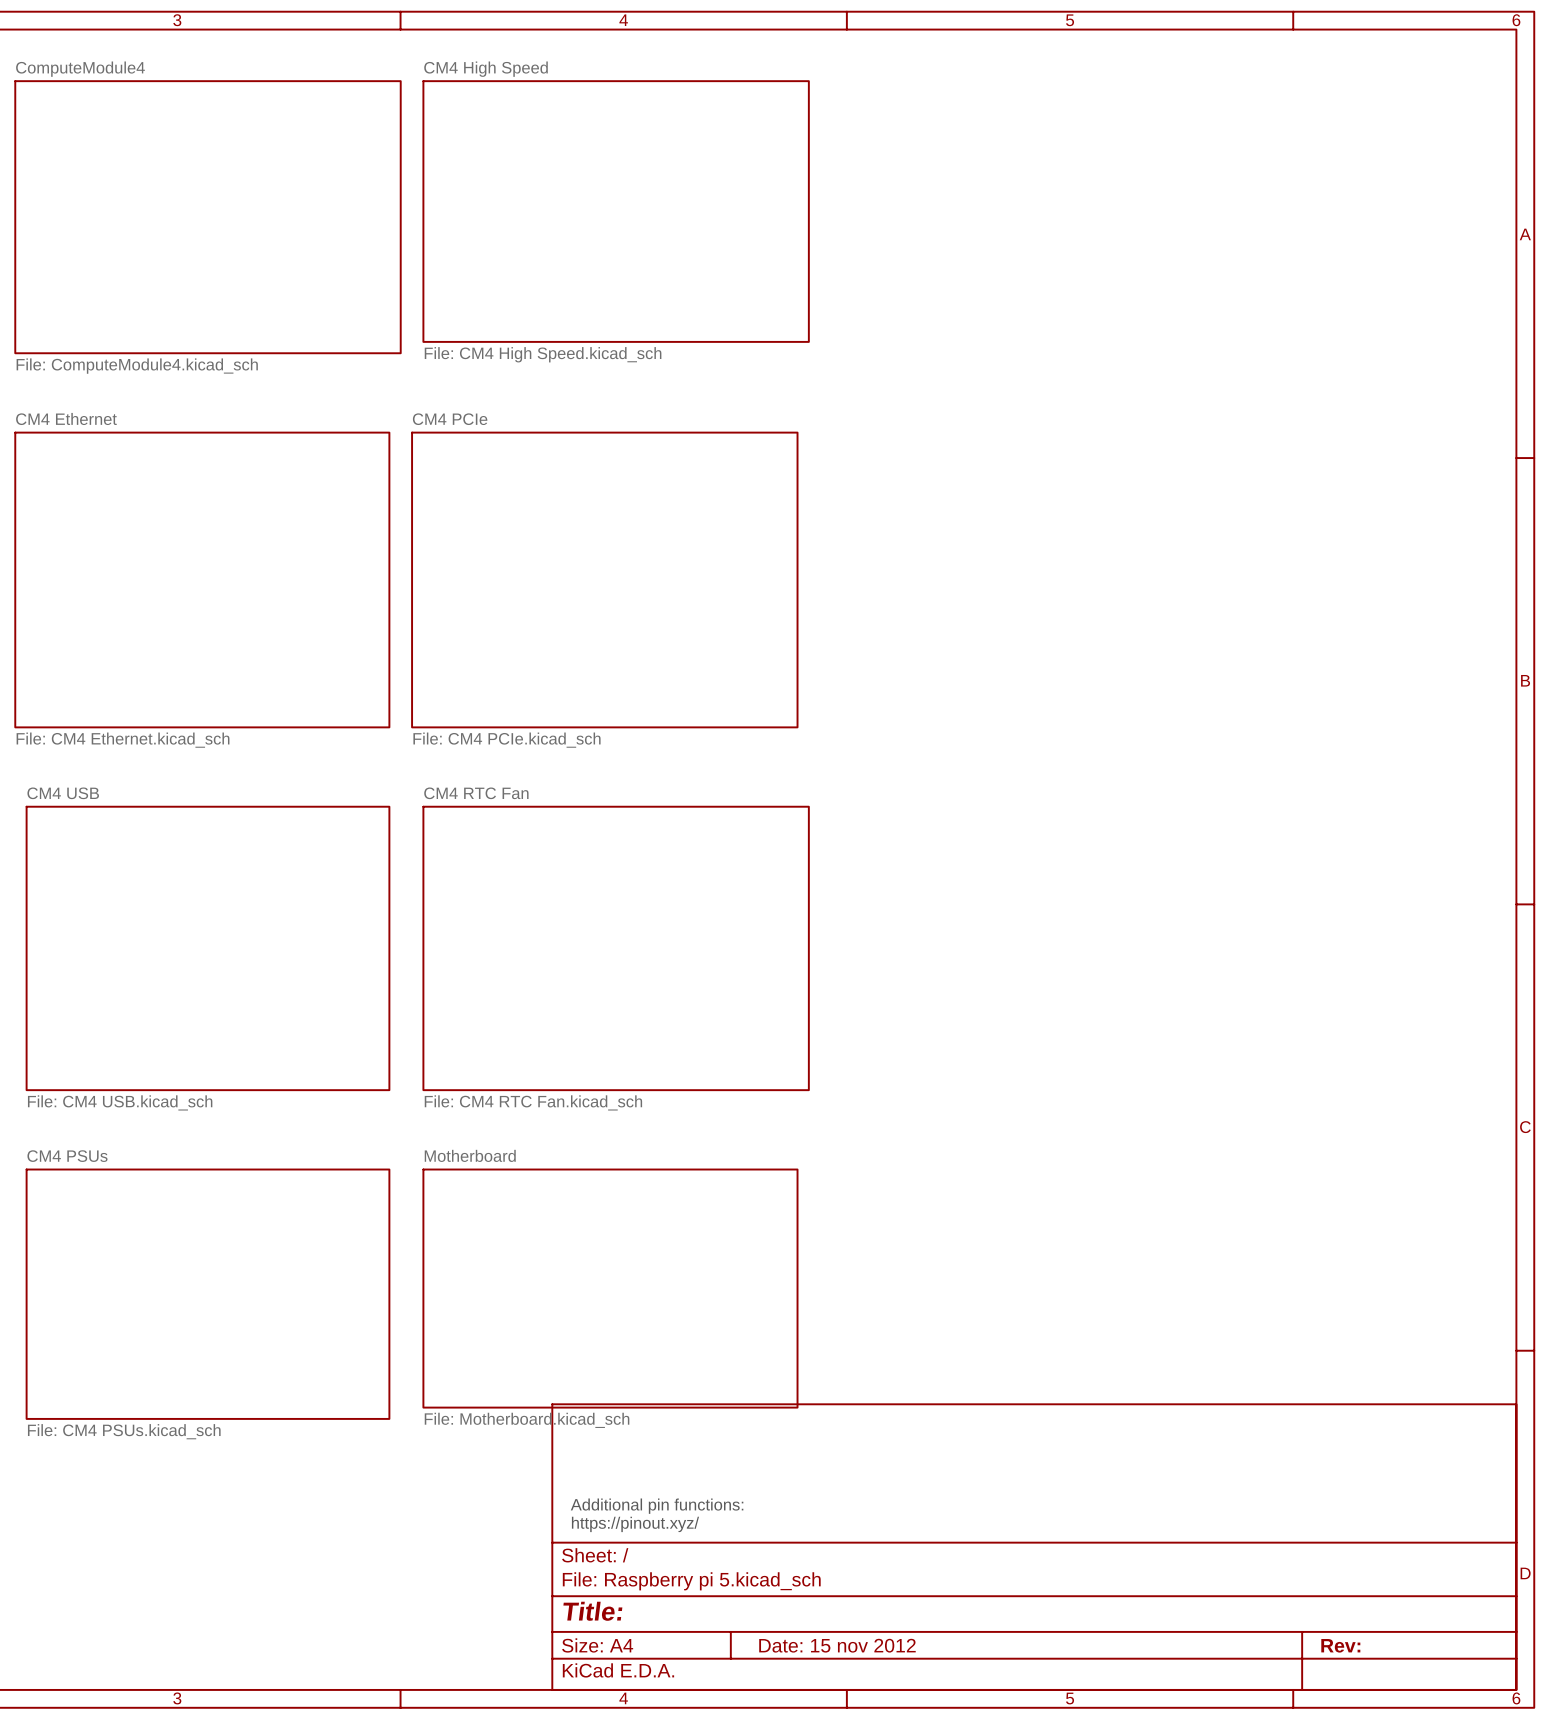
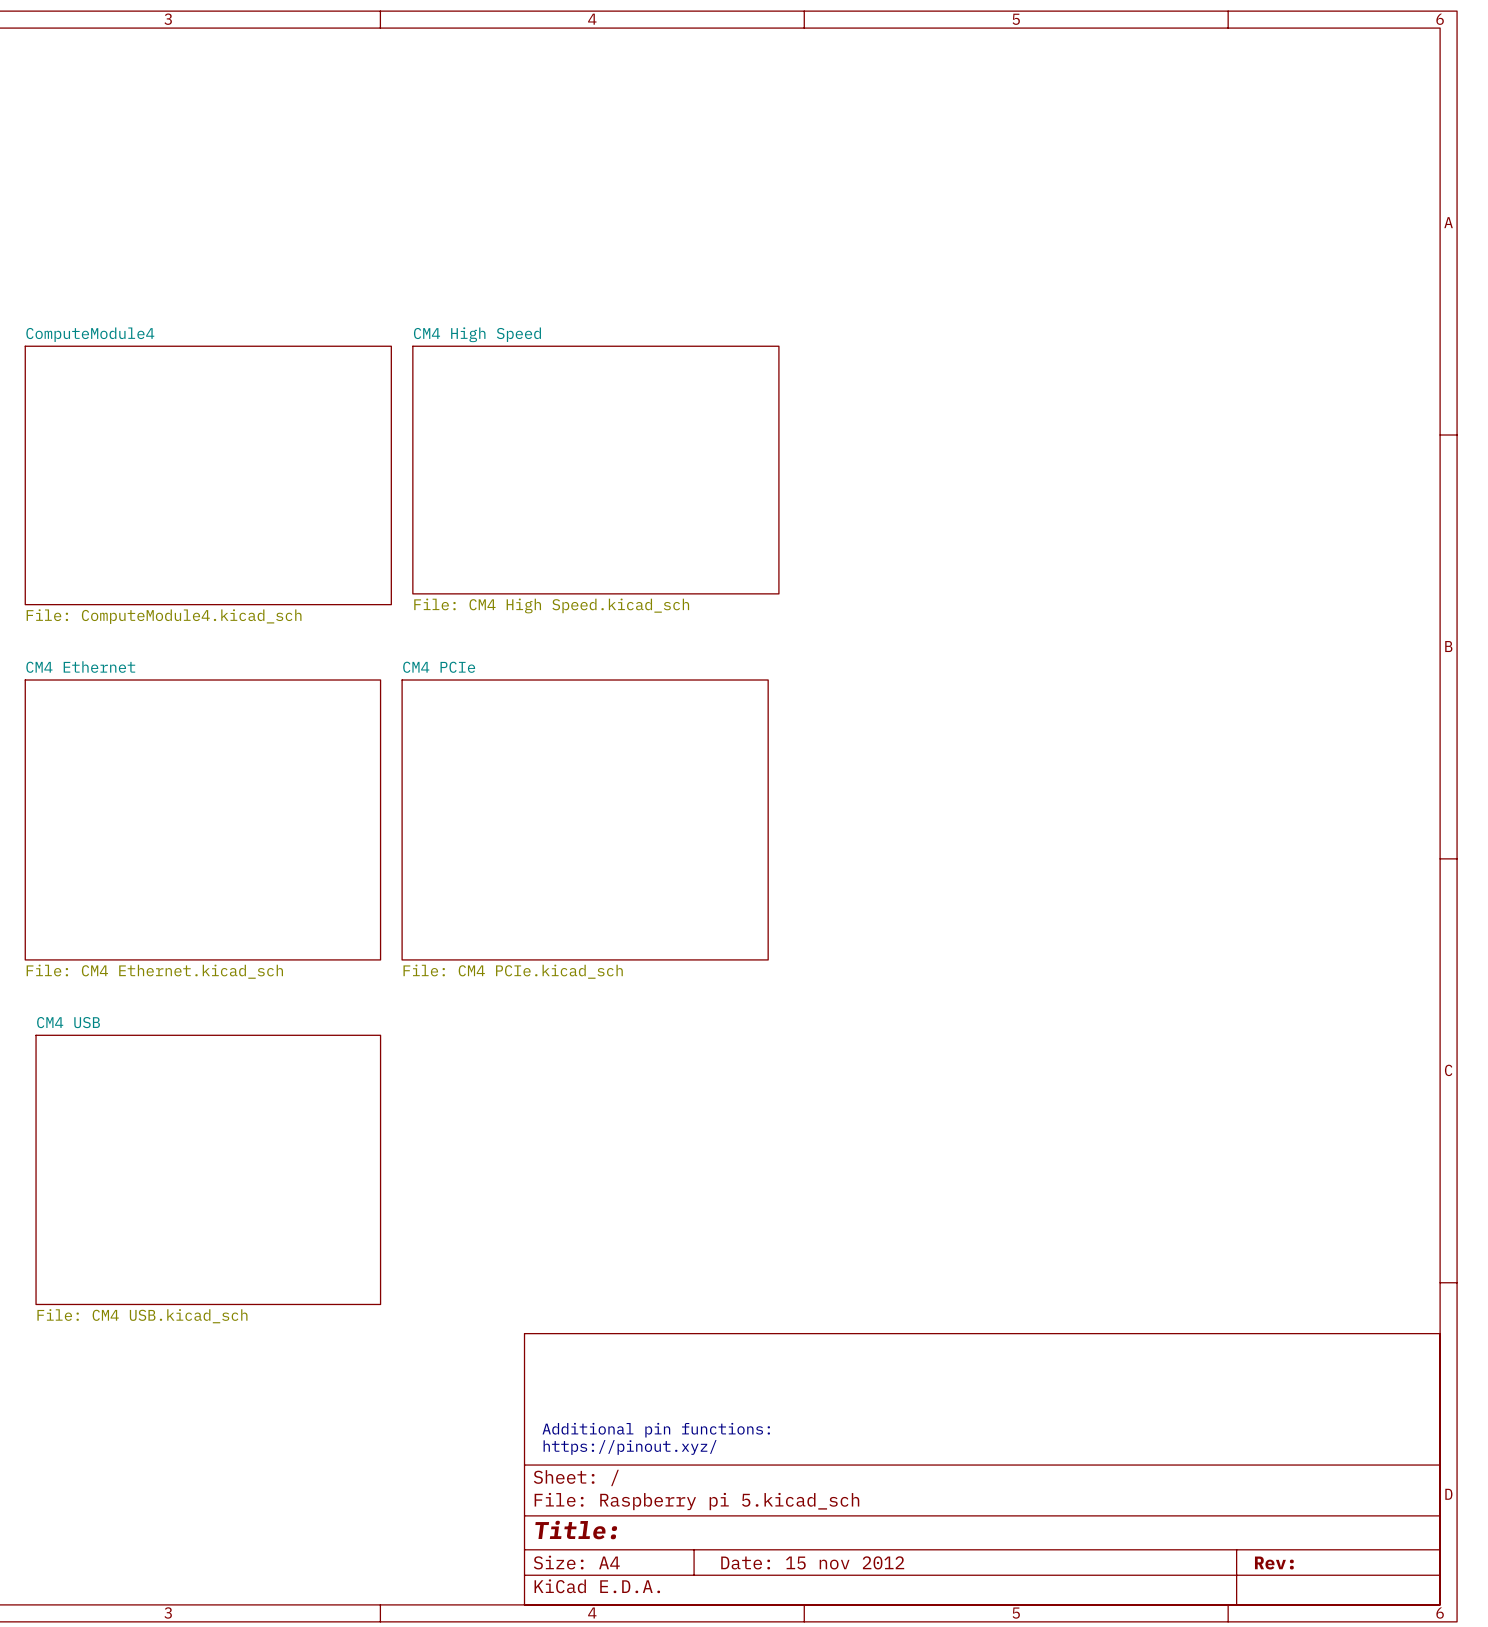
sheet CM4 High Speed position: (616, 211) -> (595, 470)
sheet ComputeModule4 position: (207, 217) -> (208, 475)
sheet CM4 Ethernet position: (202, 579) -> (202, 819)
sheet CM4 PCIe position: (604, 579) -> (585, 819)
sheet CM4 USB position: (207, 948) -> (208, 1169)
sheet CM4 RTC Fan: File: CM4 RTC Fan.kicad_sch (616, 948) -> none
sheet Motherboard: File: Motherboard.kicad_sch (610, 1288) -> none
sheet CM4 PSUs: File: CM4 PSUs.kicad_sch (207, 1294) -> none

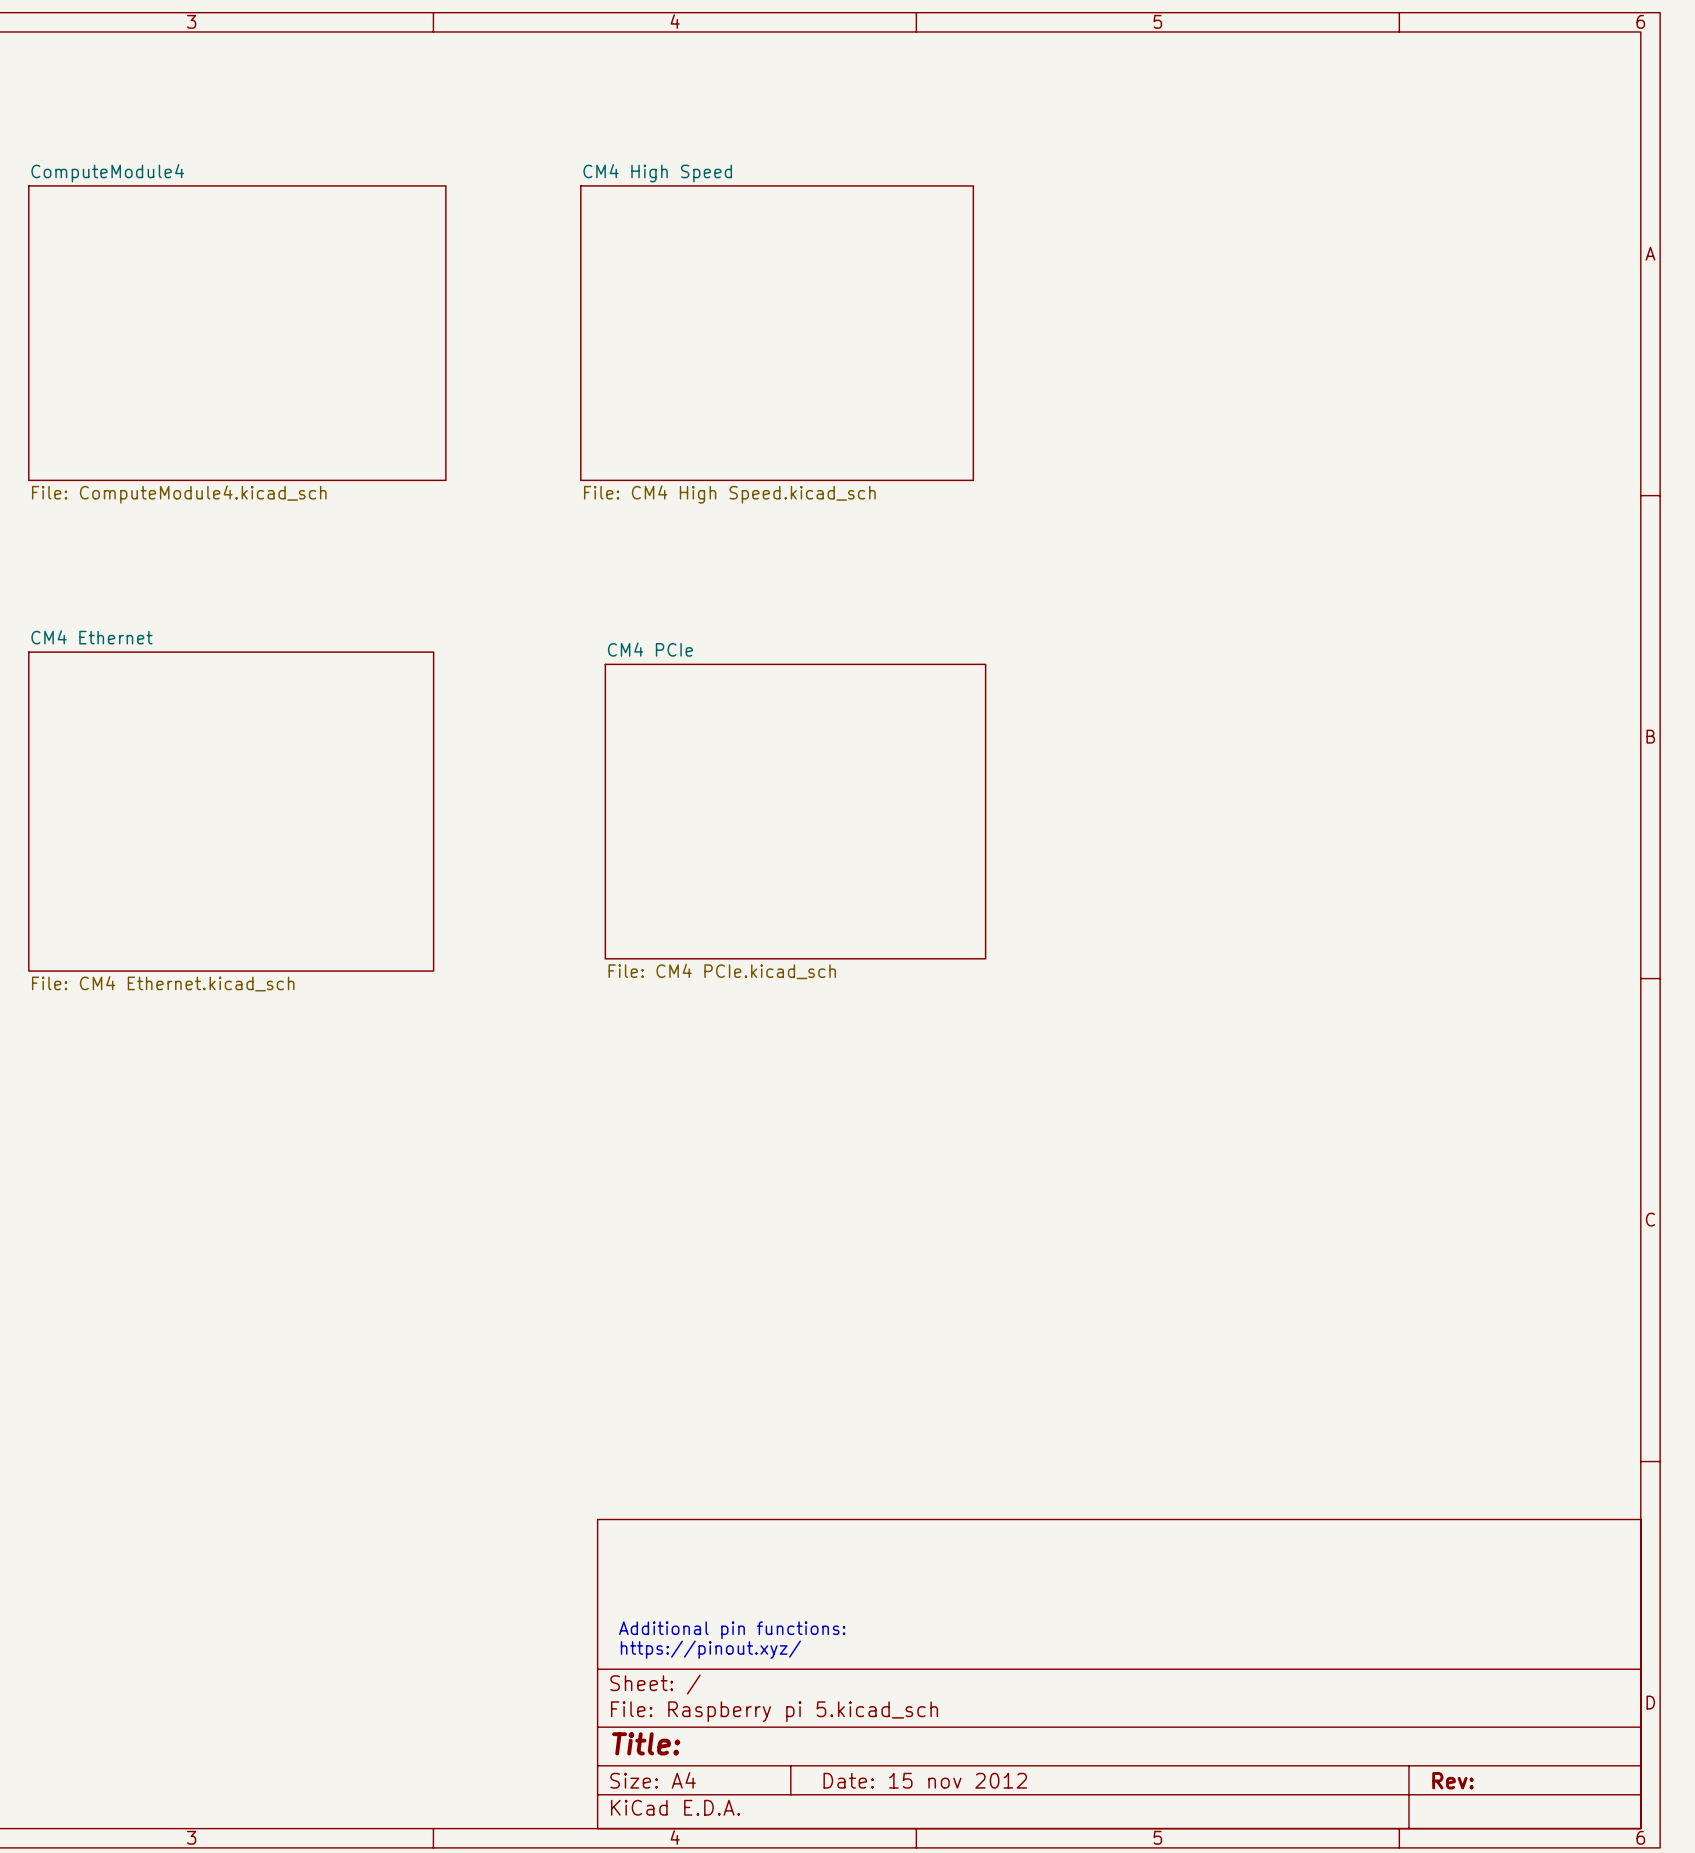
sheet CM4 High Speed shape: [412, 345, 780, 595] -> [580, 185, 975, 482]
sheet ComputeModule4 position: (208, 475) -> (237, 333)
sheet CM4 PCIe name position: CM4 PCIe (439, 667) -> CM4 PCIe (650, 649)
sheet CM4 PCIe shape: [401, 679, 769, 961] -> [604, 663, 987, 960]
sheet CM4 Ethernet position: (202, 819) -> (231, 811)
sheet CM4 PCIe value position: File: CM4 PCIe.kicad_sch (513, 971) -> File: CM4 PCIe.kicad_sch (722, 971)
sheet CM4 USB: File: CM4 USB.kicad_sch (208, 1169) -> none

